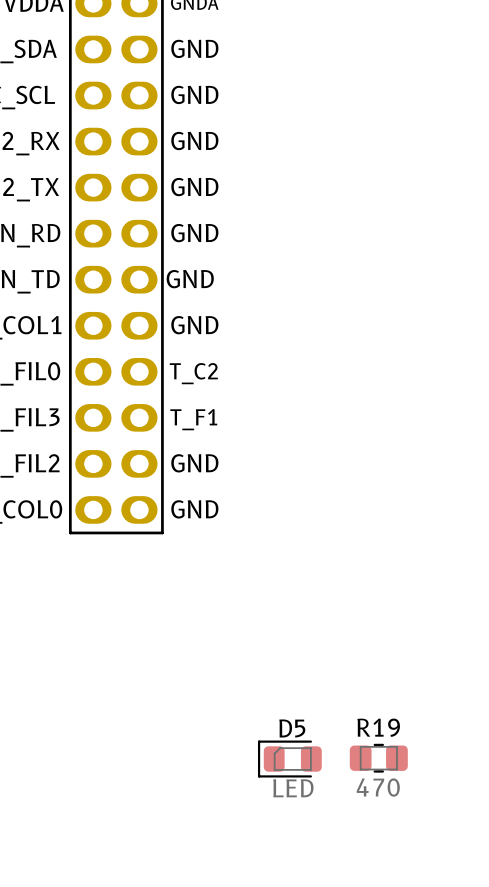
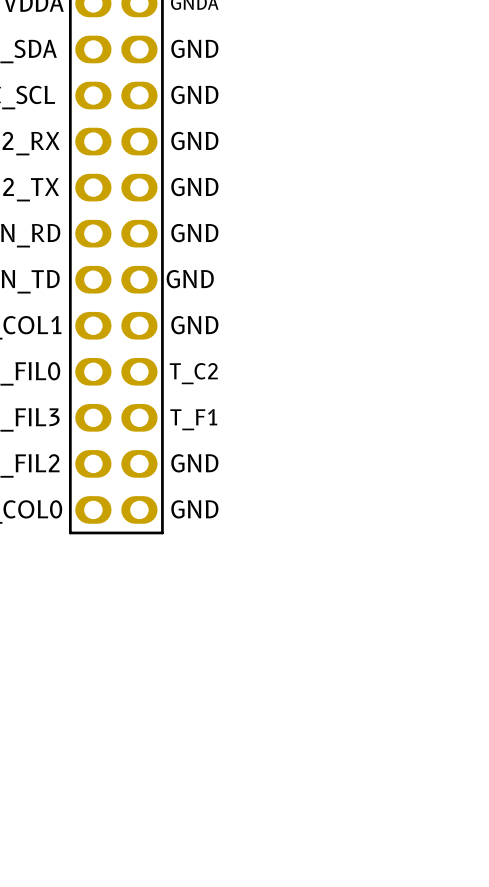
R19: 470 (378, 758) -> none
D5: LED (289, 759) -> none

